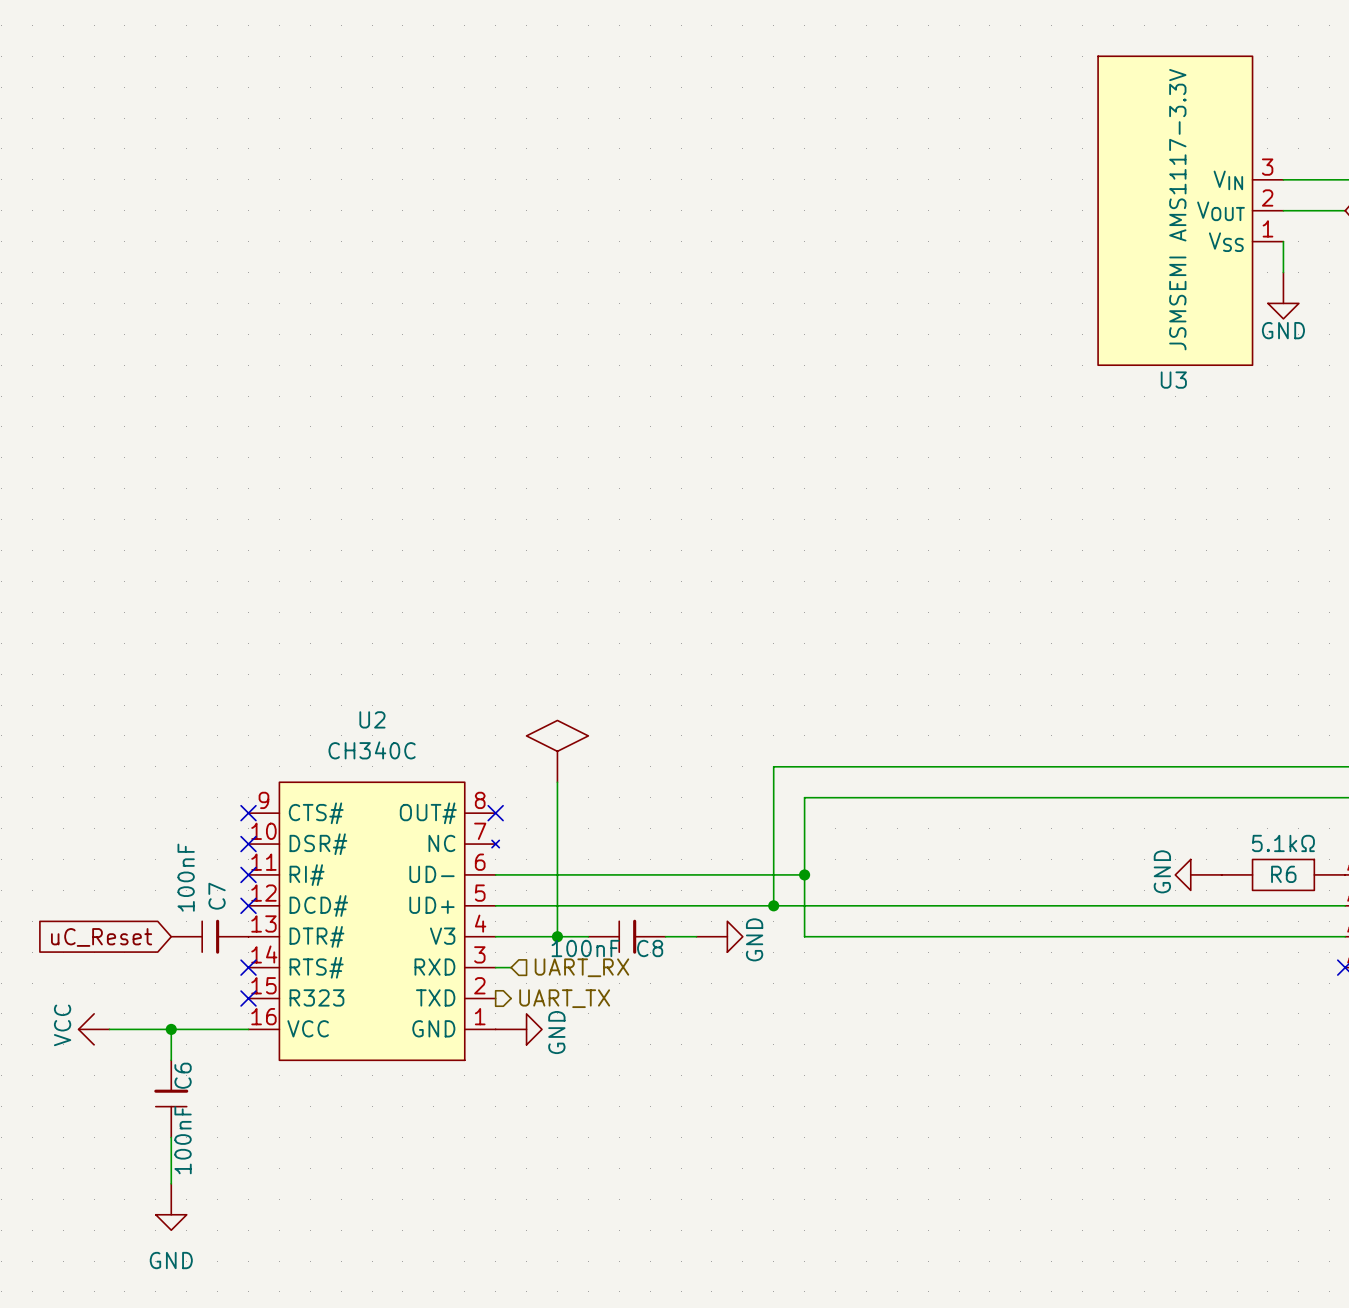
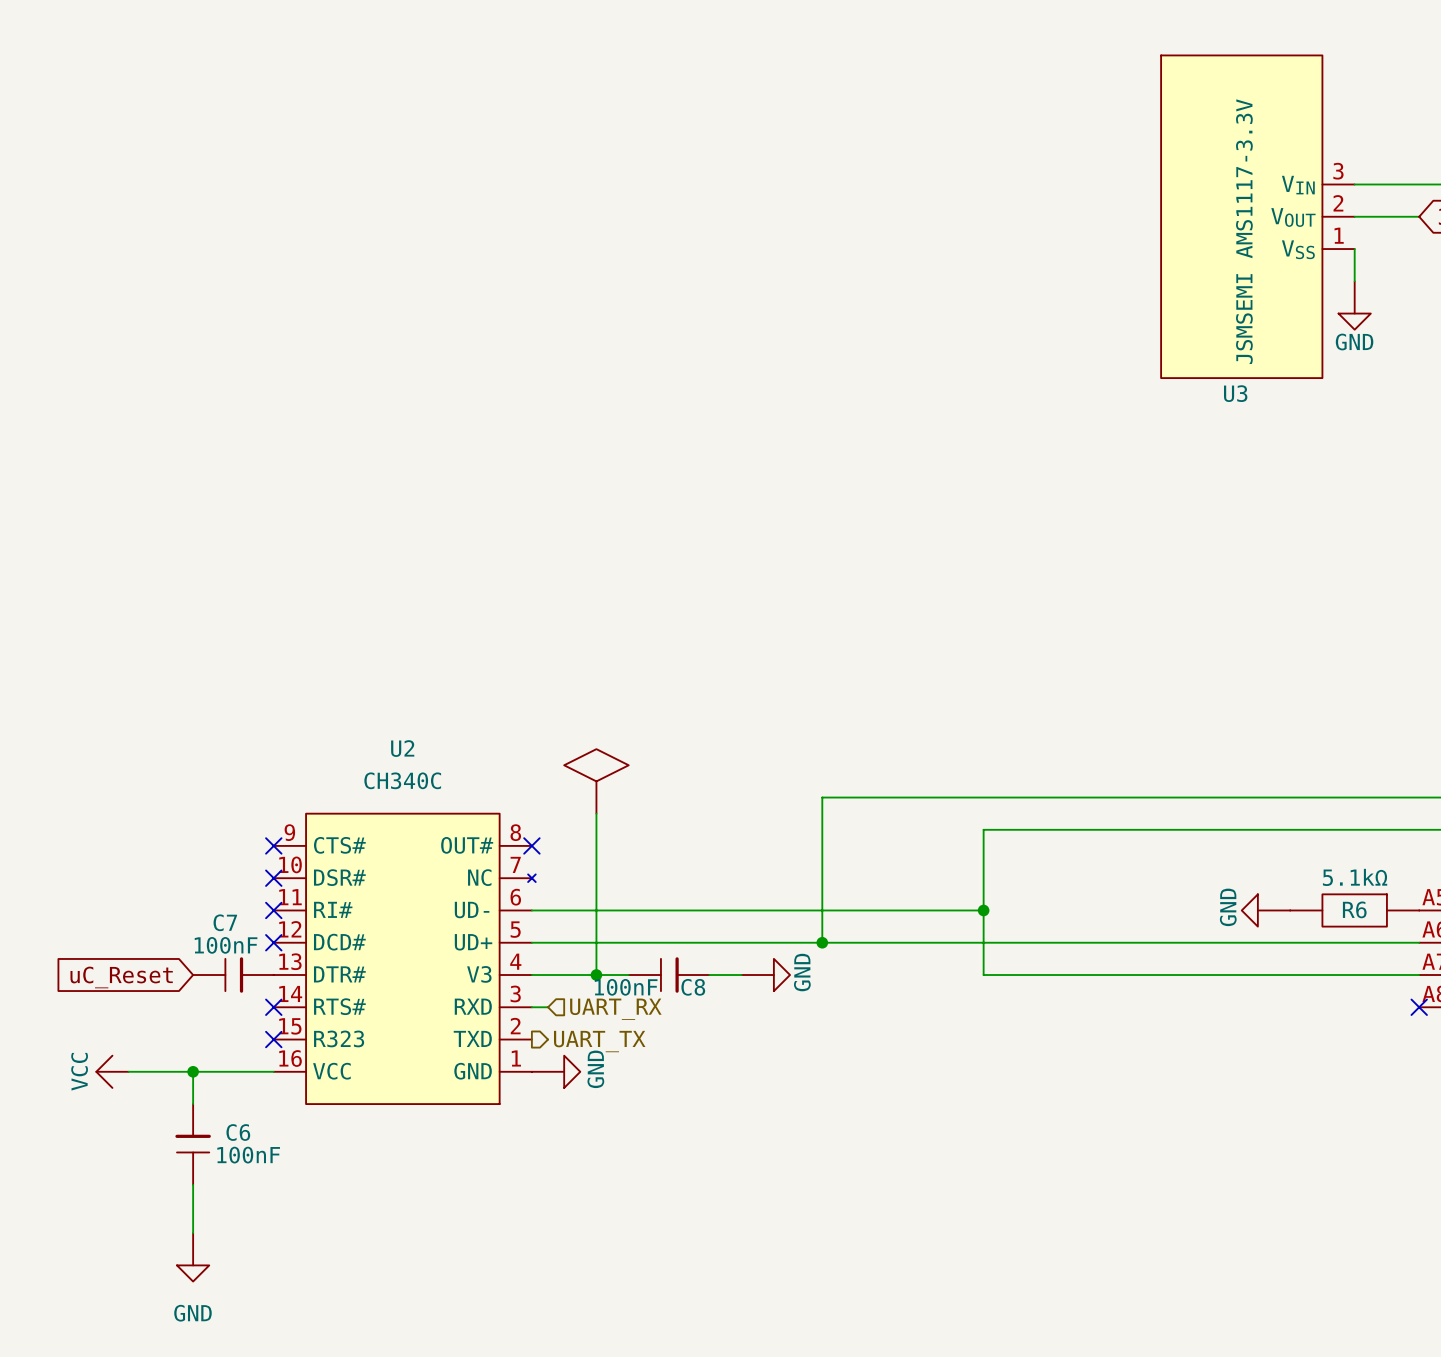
wire: (928, 797) (804, 797) (804, 936) (928, 936) -> (983, 829) (983, 975)
wire: none -> (854, 910) (983, 910)
junction: (804, 874) -> none
junction: none -> (983, 910)
C7 value rotation: 0° (186, 877) -> 90° clockwise (226, 945)
C7 name rotation: 0° (217, 896) -> 90° clockwise (225, 922)
C6 name rotation: 0° (183, 1075) -> 90° clockwise (238, 1132)
C6 value rotation: 0° (183, 1140) -> 90° clockwise (248, 1155)

